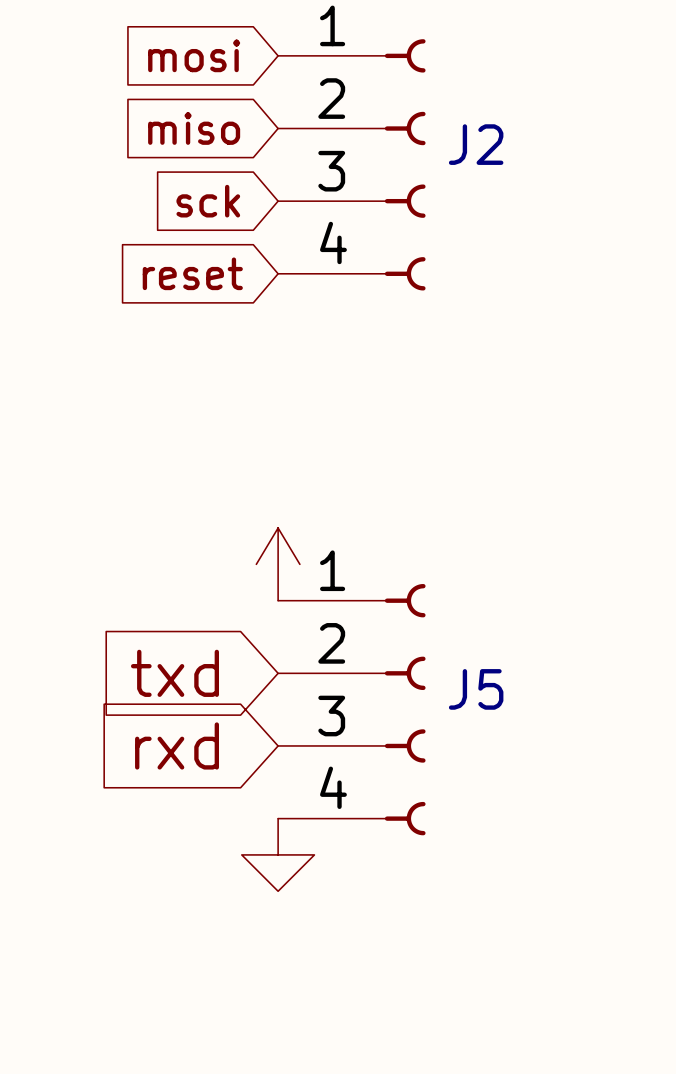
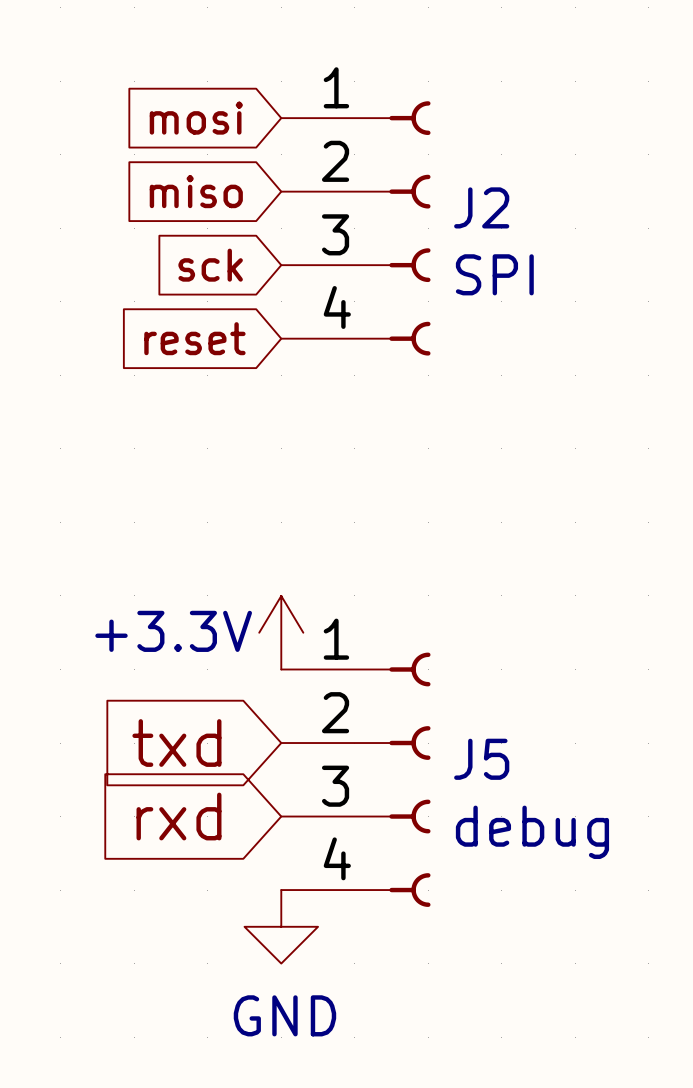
J2 value: none -> SPI (494, 274)
power symbol text: none -> +3.3V (173, 631)
J5 value: none -> debug (532, 832)
power symbol text: none -> GND (284, 1015)

